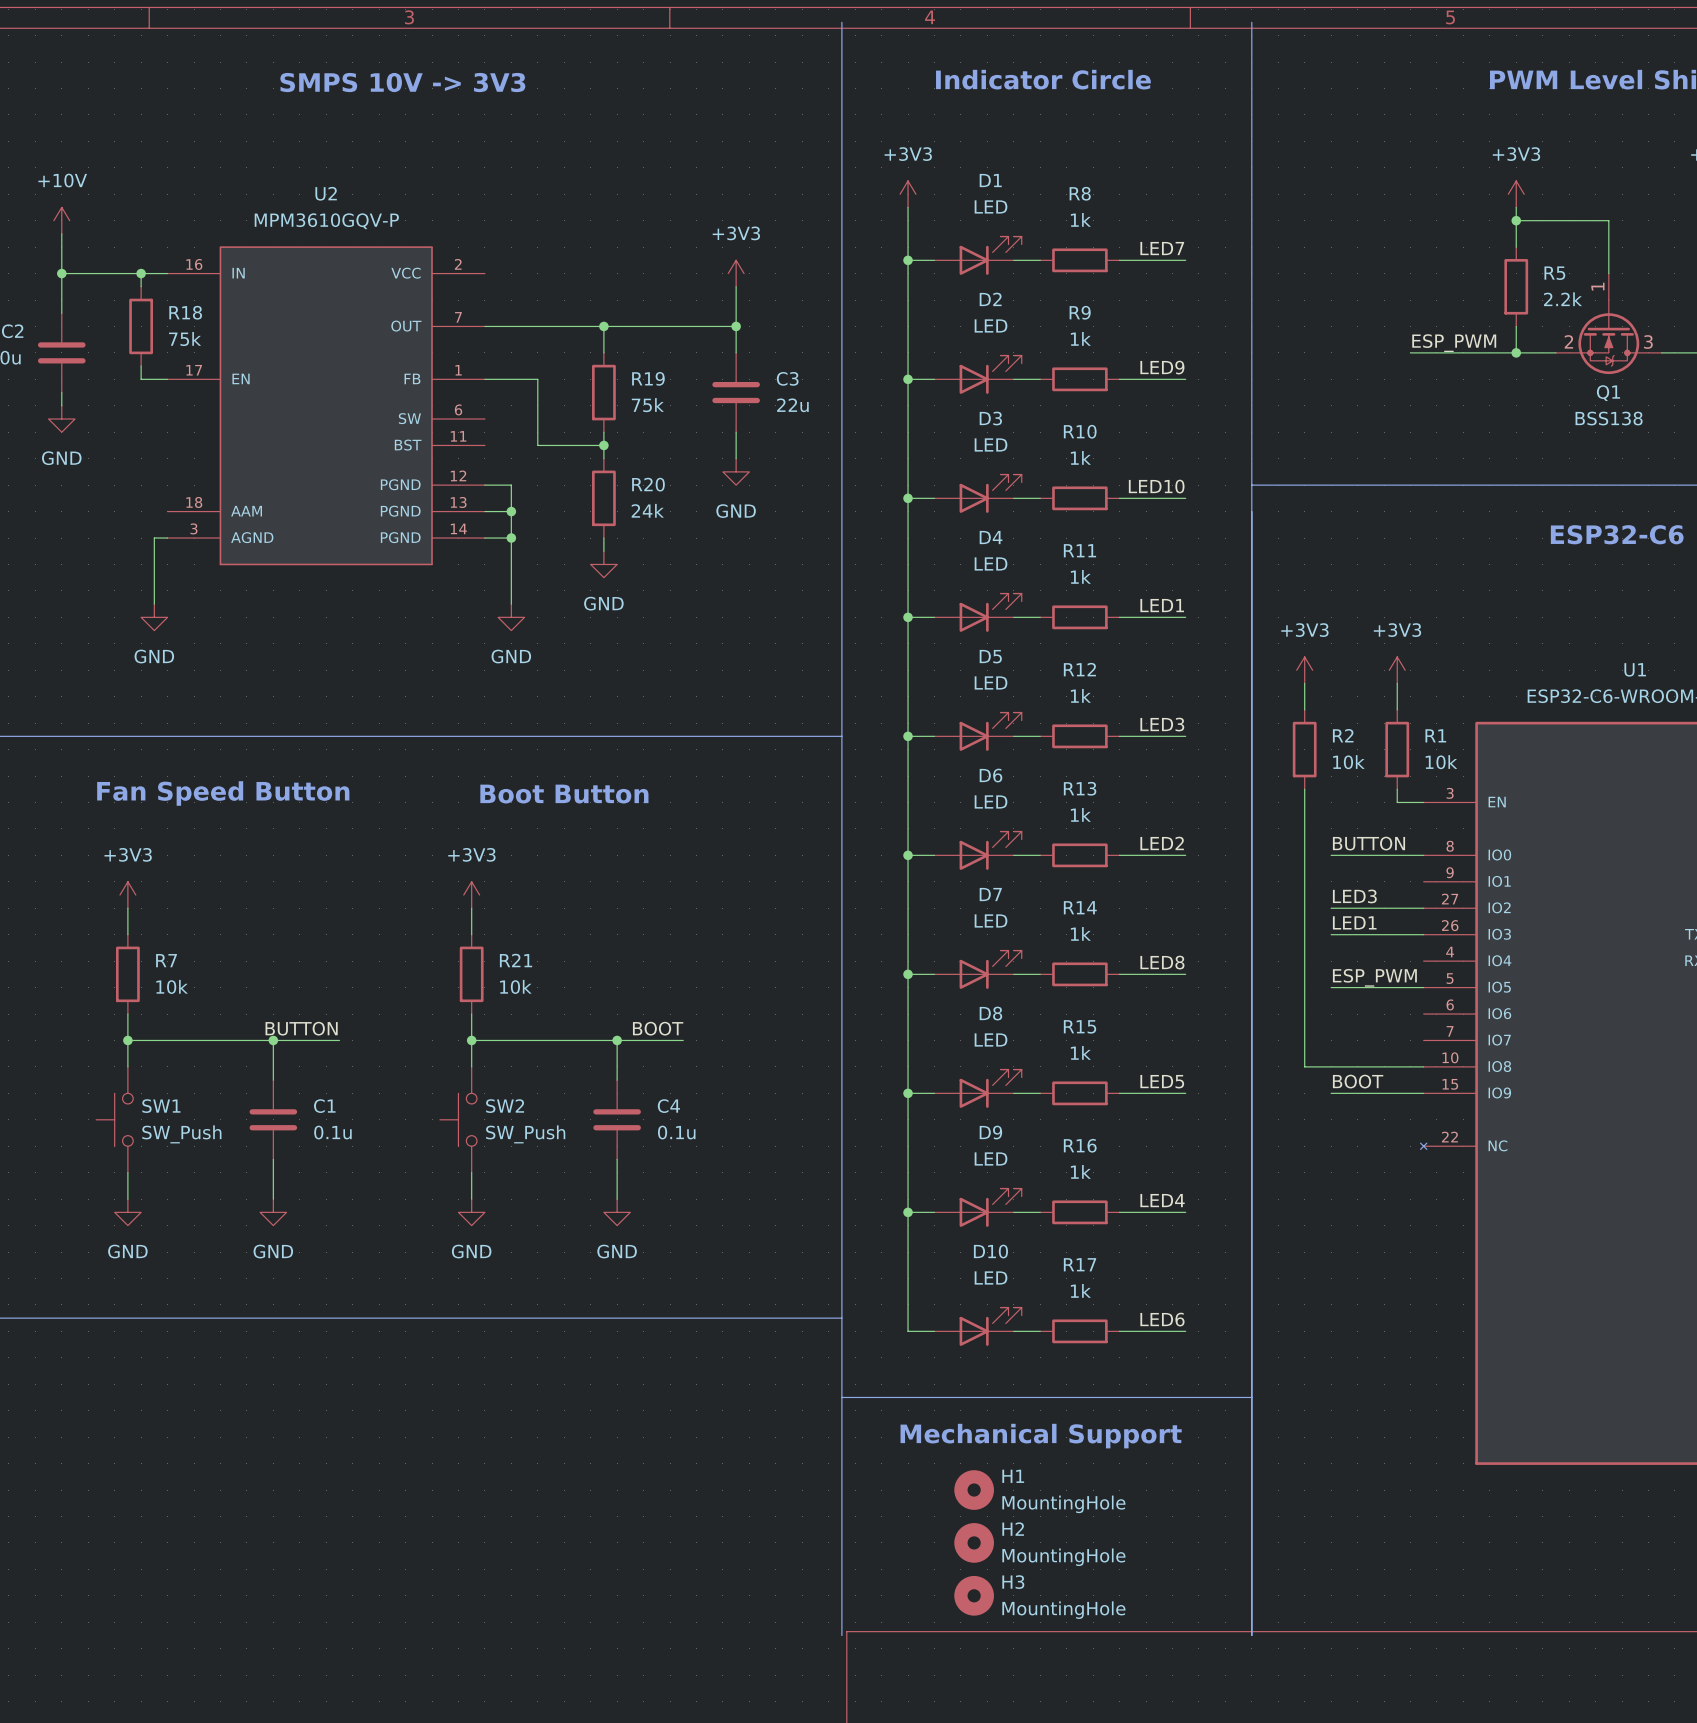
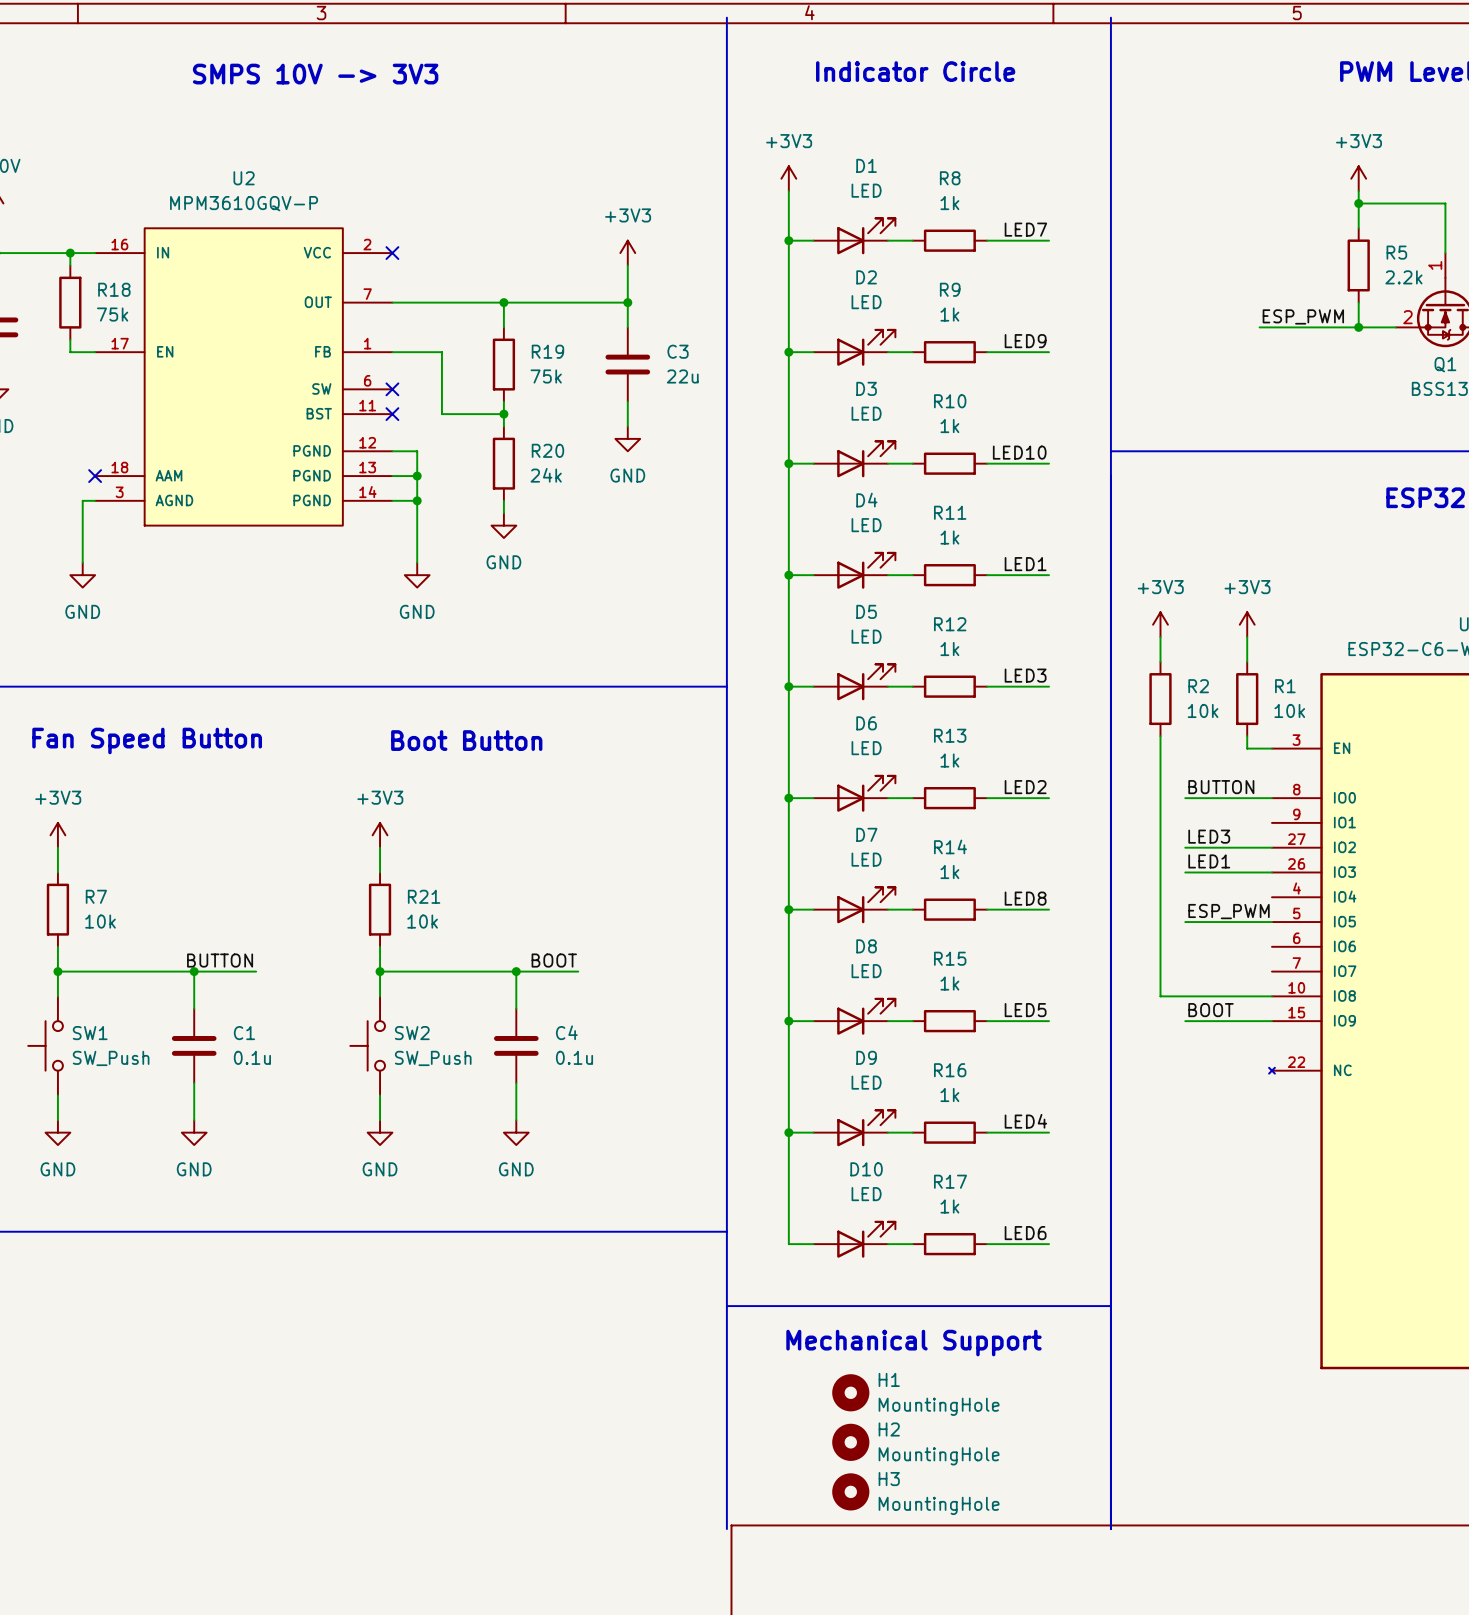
no-connect mark: none -> (392, 253)
no-connect mark: none -> (392, 389)
no-connect mark: none -> (392, 414)
no-connect mark: none -> (95, 476)

